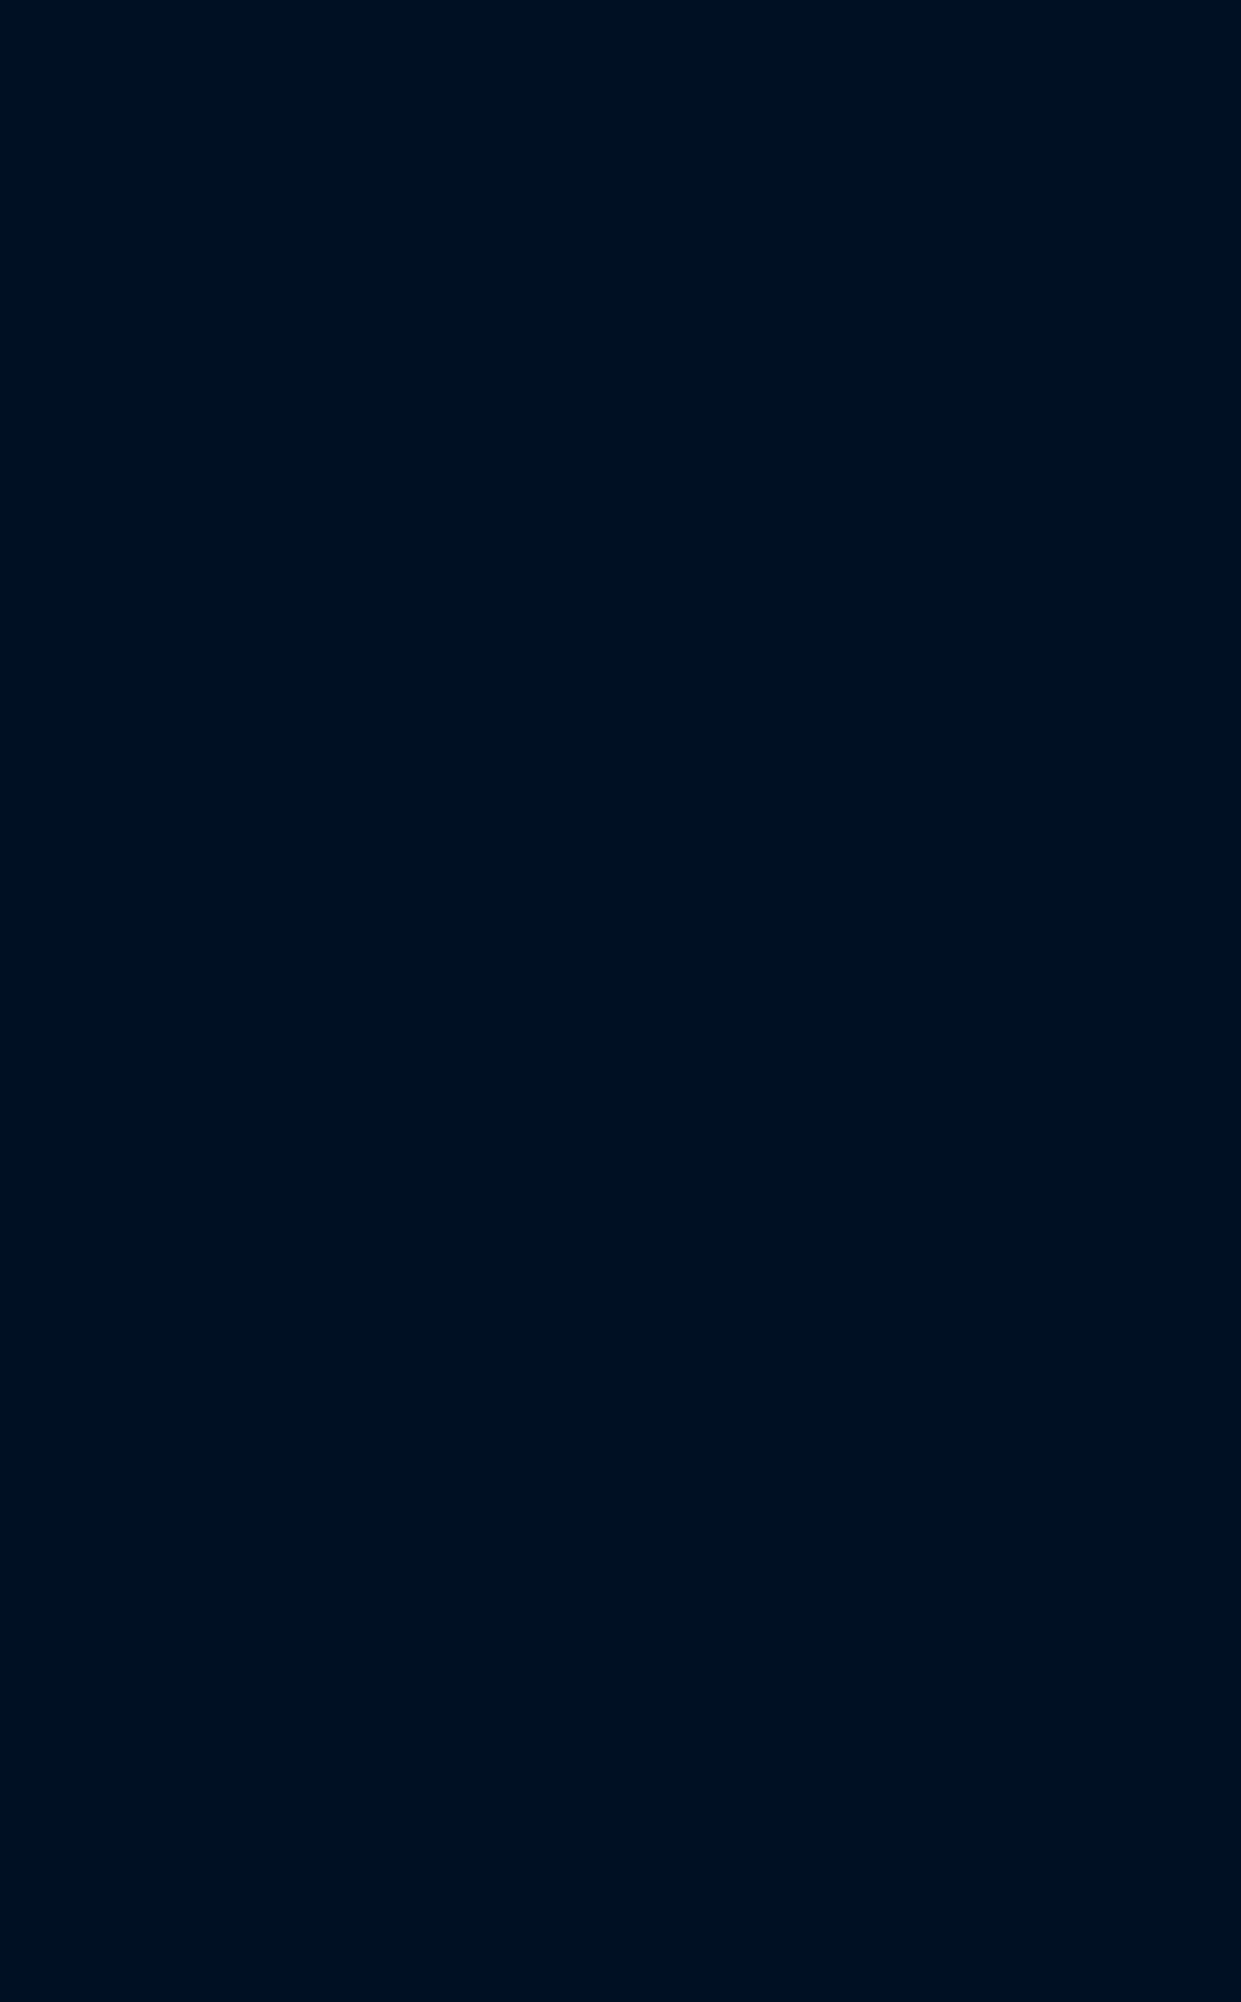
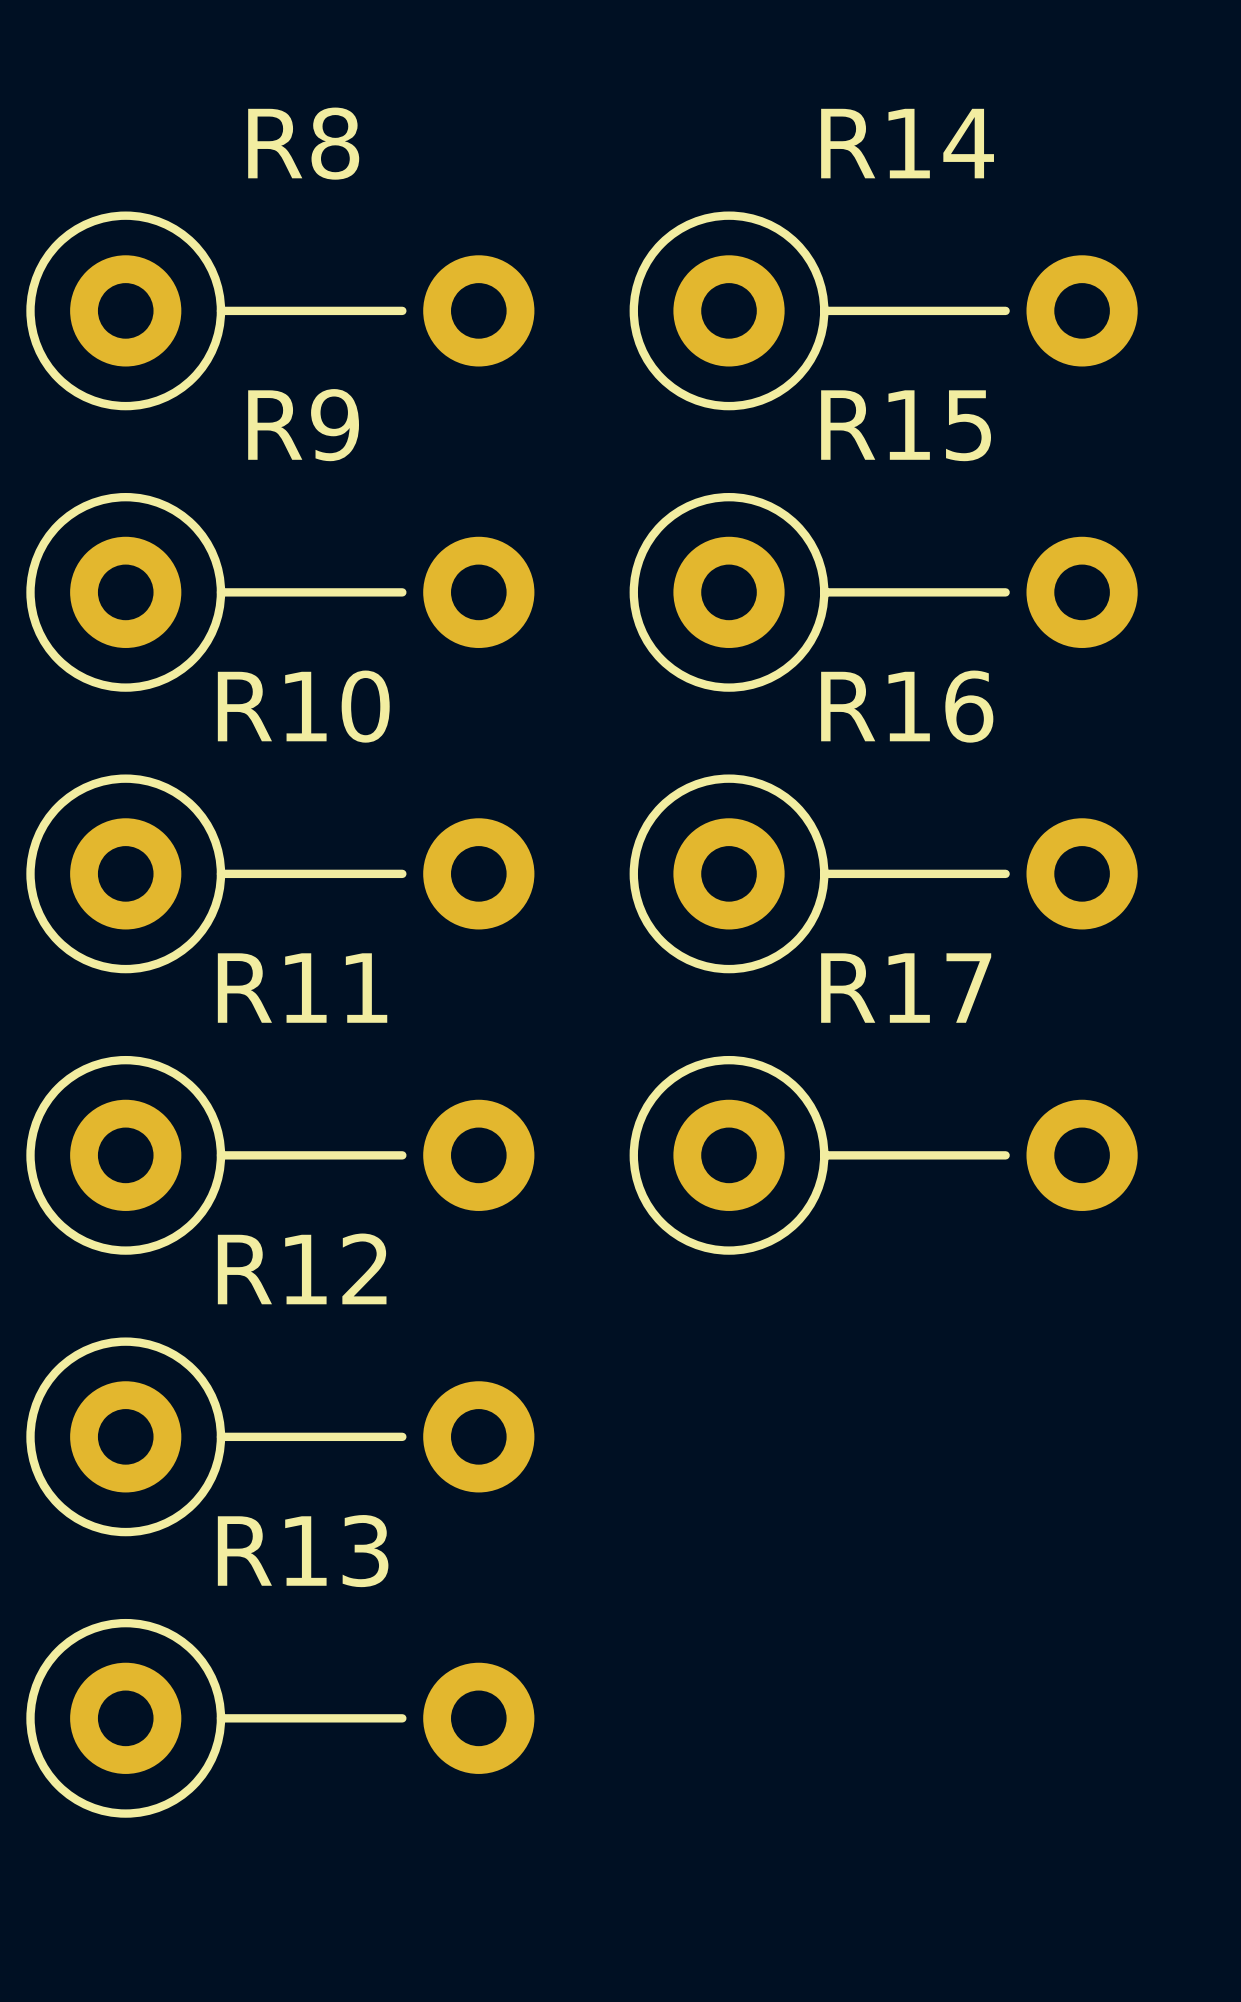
R8: none -> (280, 310)
R14: none -> (883, 310)
R9: none -> (280, 592)
R15: none -> (883, 592)
R10: none -> (280, 873)
R16: none -> (883, 873)
R11: none -> (280, 1155)
R17: none -> (883, 1155)
R12: none -> (280, 1436)
R13: none -> (280, 1718)

